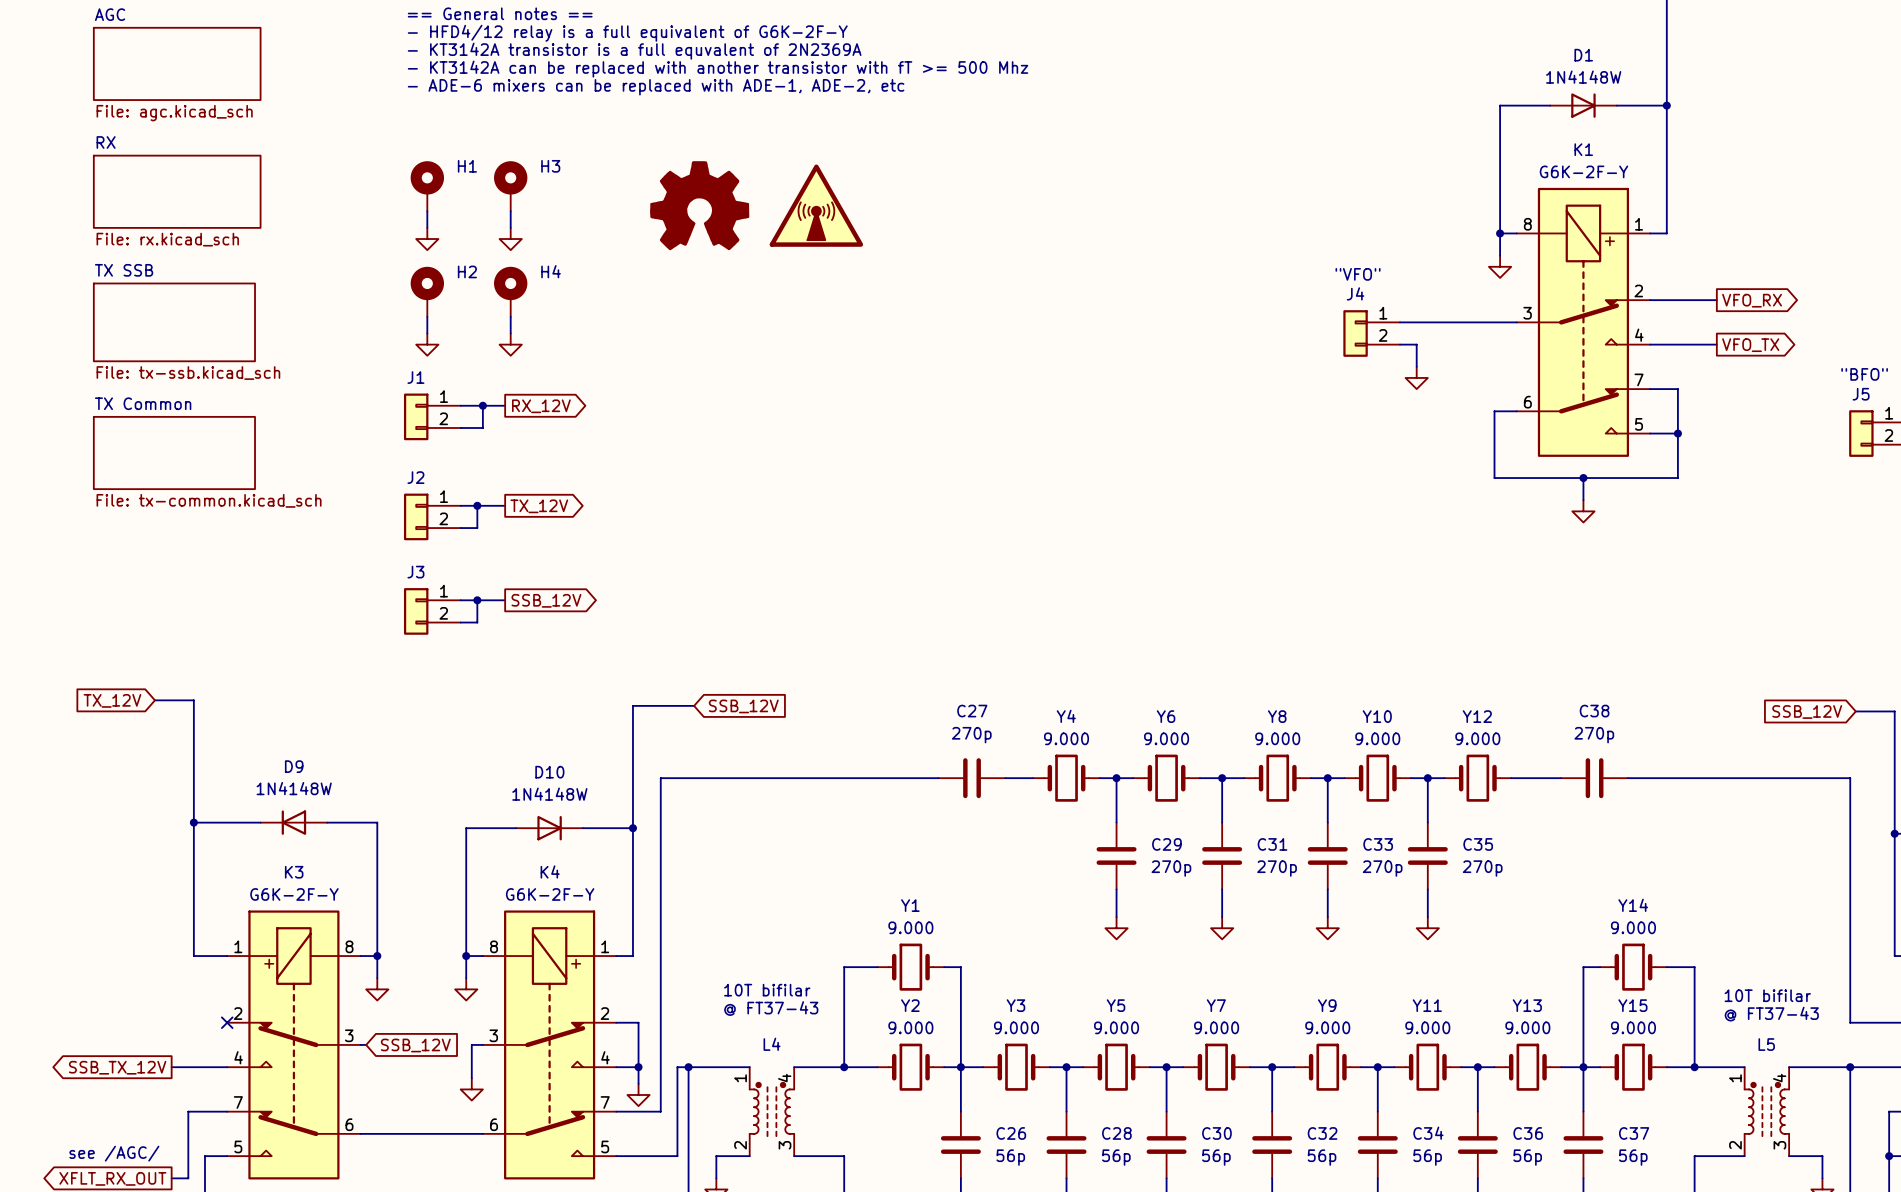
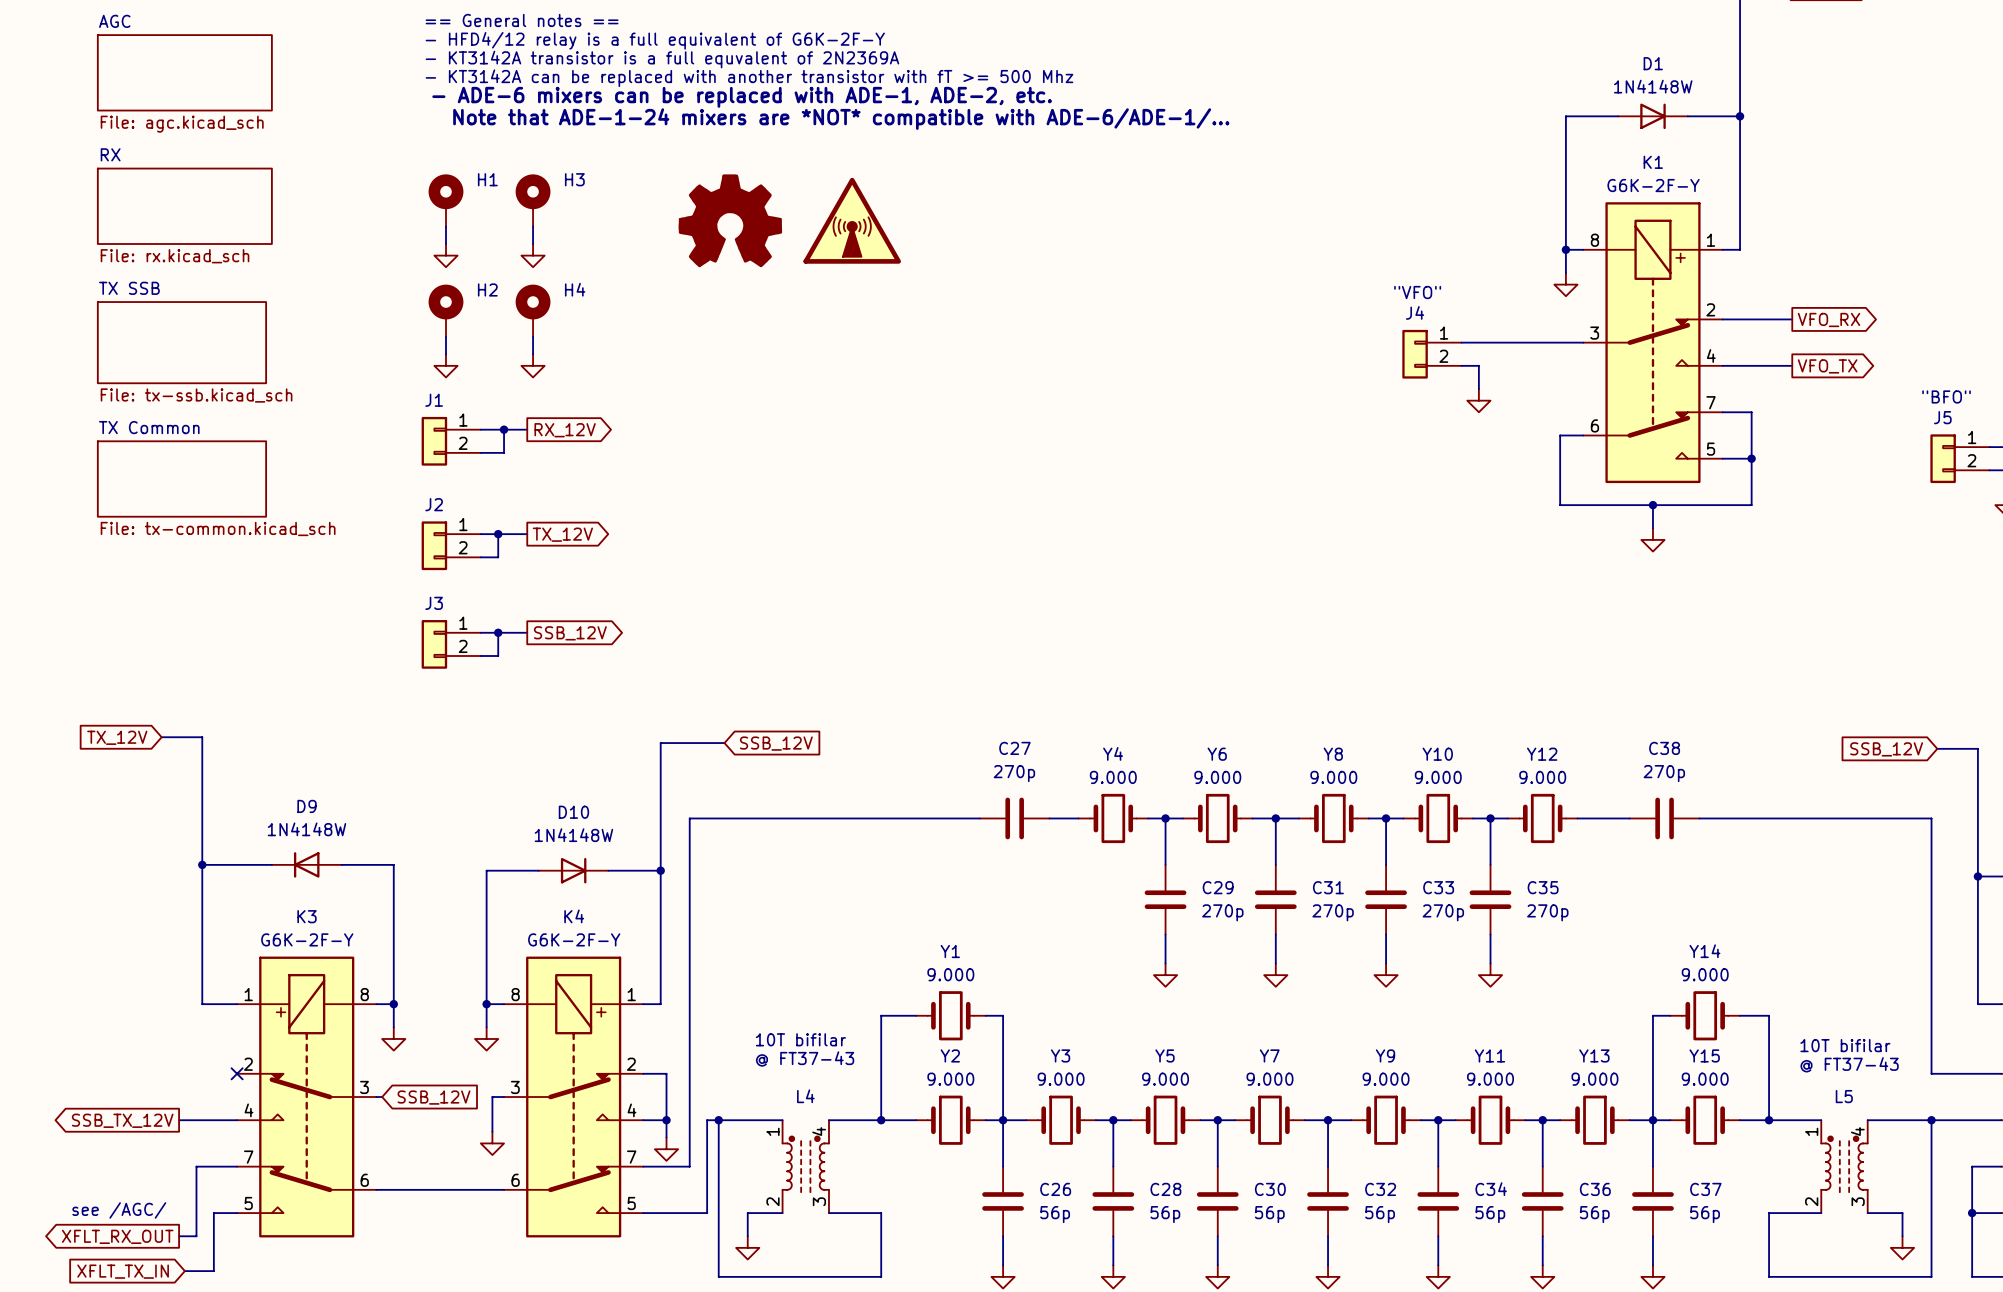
text: - ADE-6 mixers can be replaced with ADE-1, ADE-2, etc (656, 87) -> - ADE-6 mixers can be replaced with ADE-1, ADE-2, etc. (742, 97)
text: none -> Note that ADE-1-24 mixers are *NOT* compatible with ADE-6/ADE-1/... (841, 119)

